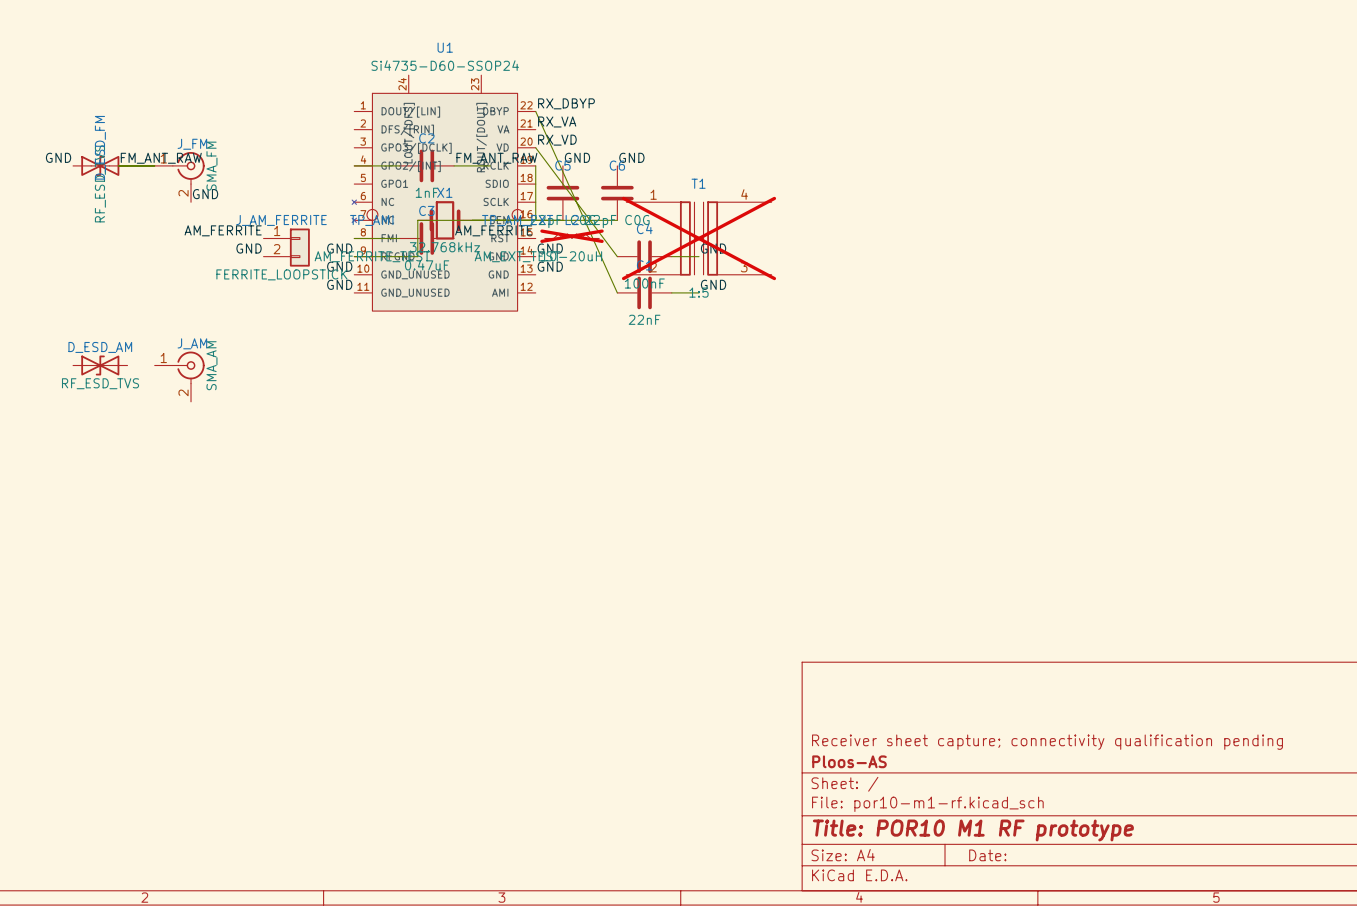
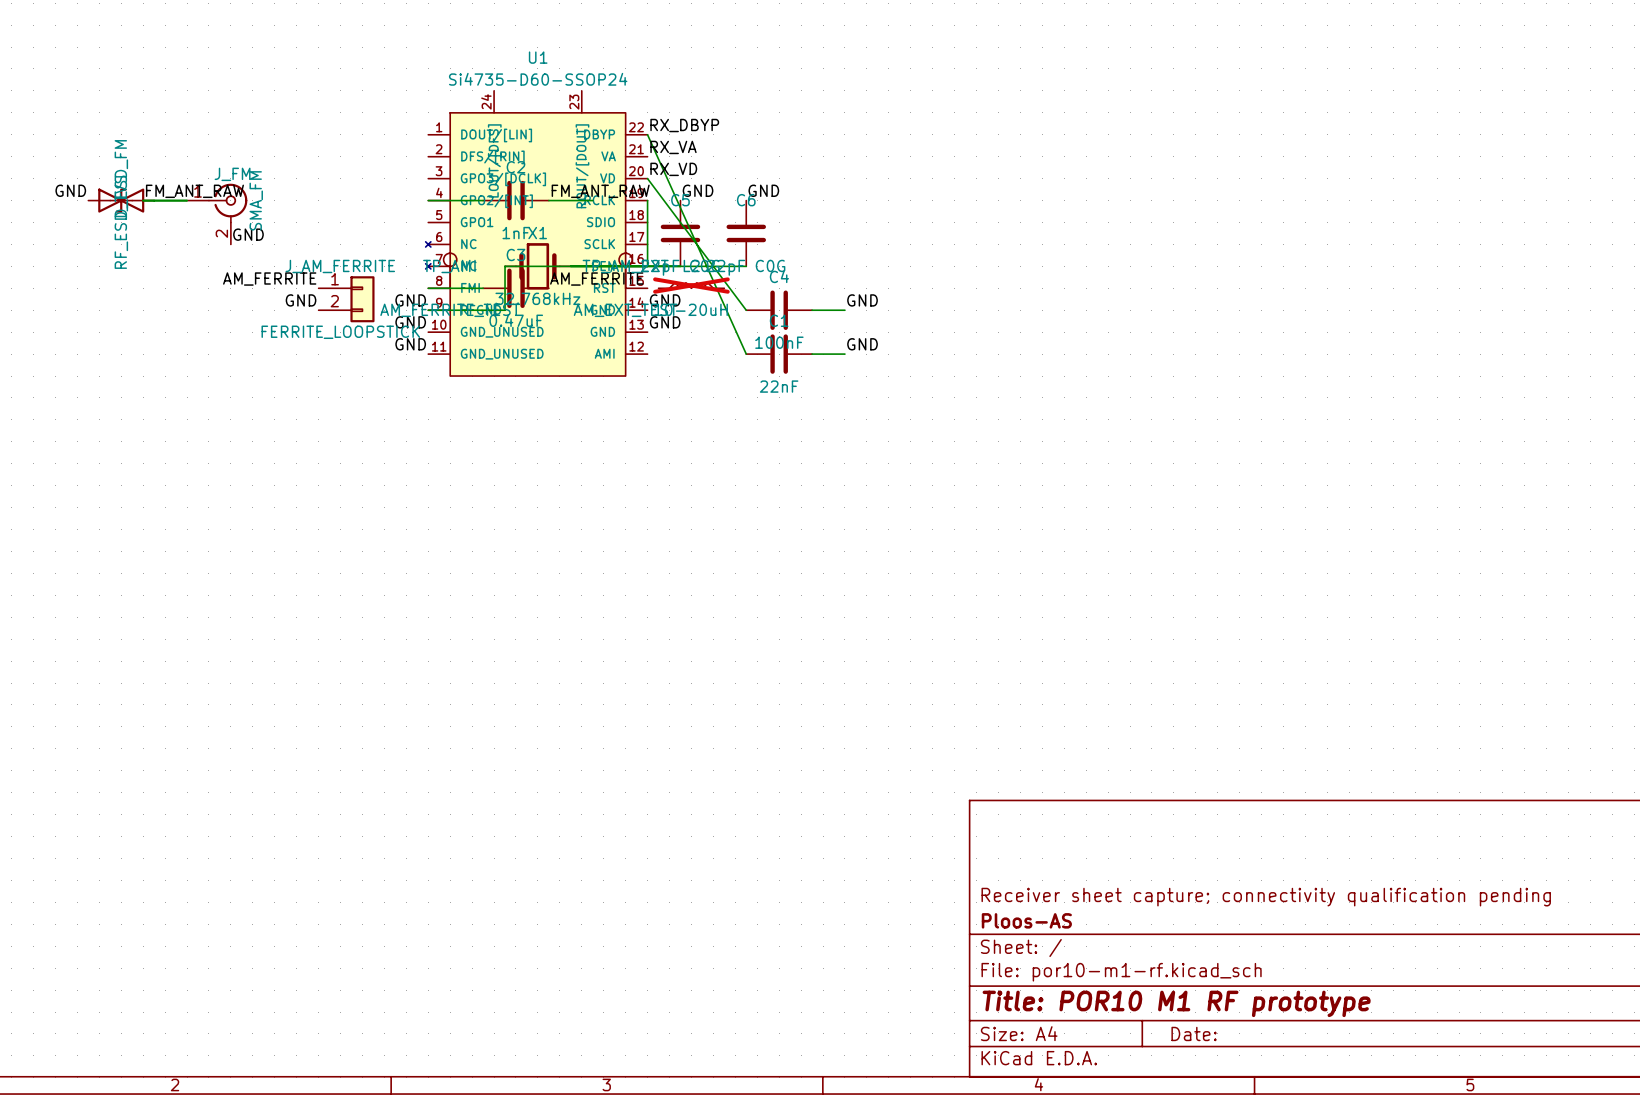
T1: 1:5 (699, 238) -> none
D_ESD_AM: RF_ESD_TVS (100, 365) -> none
J_AM: SMA_AM (179, 376) -> none

